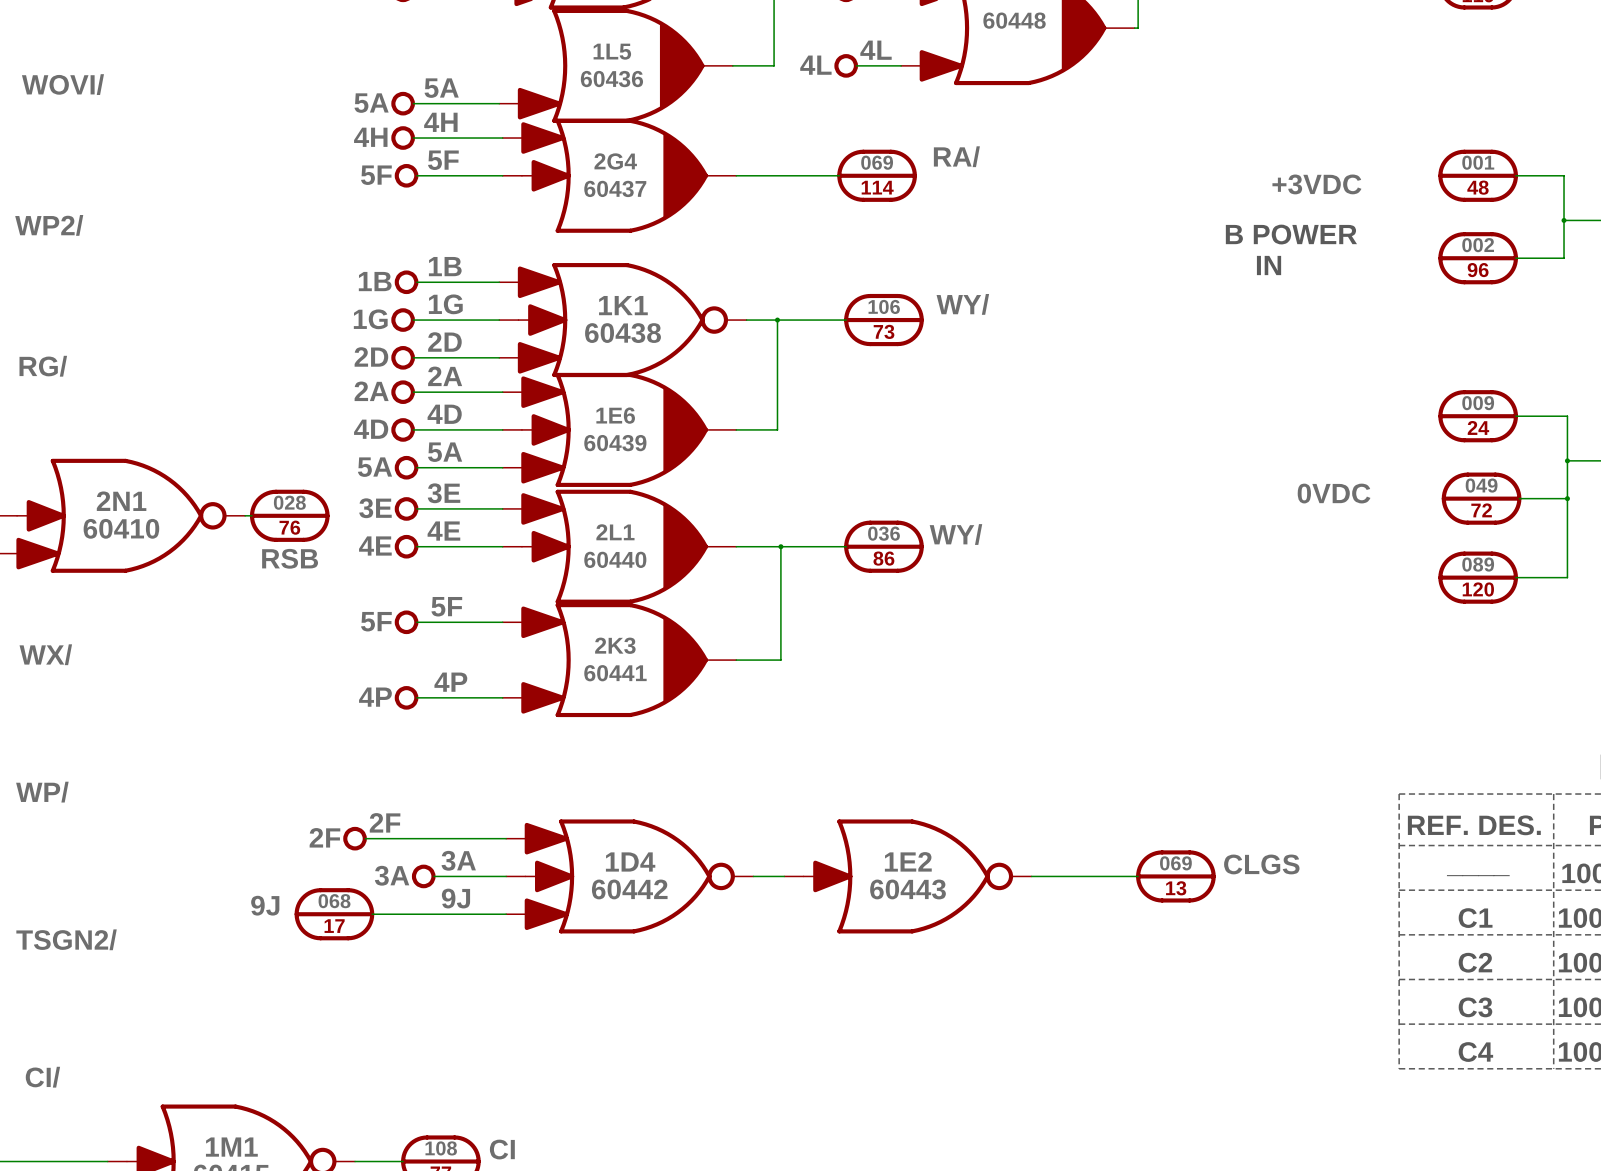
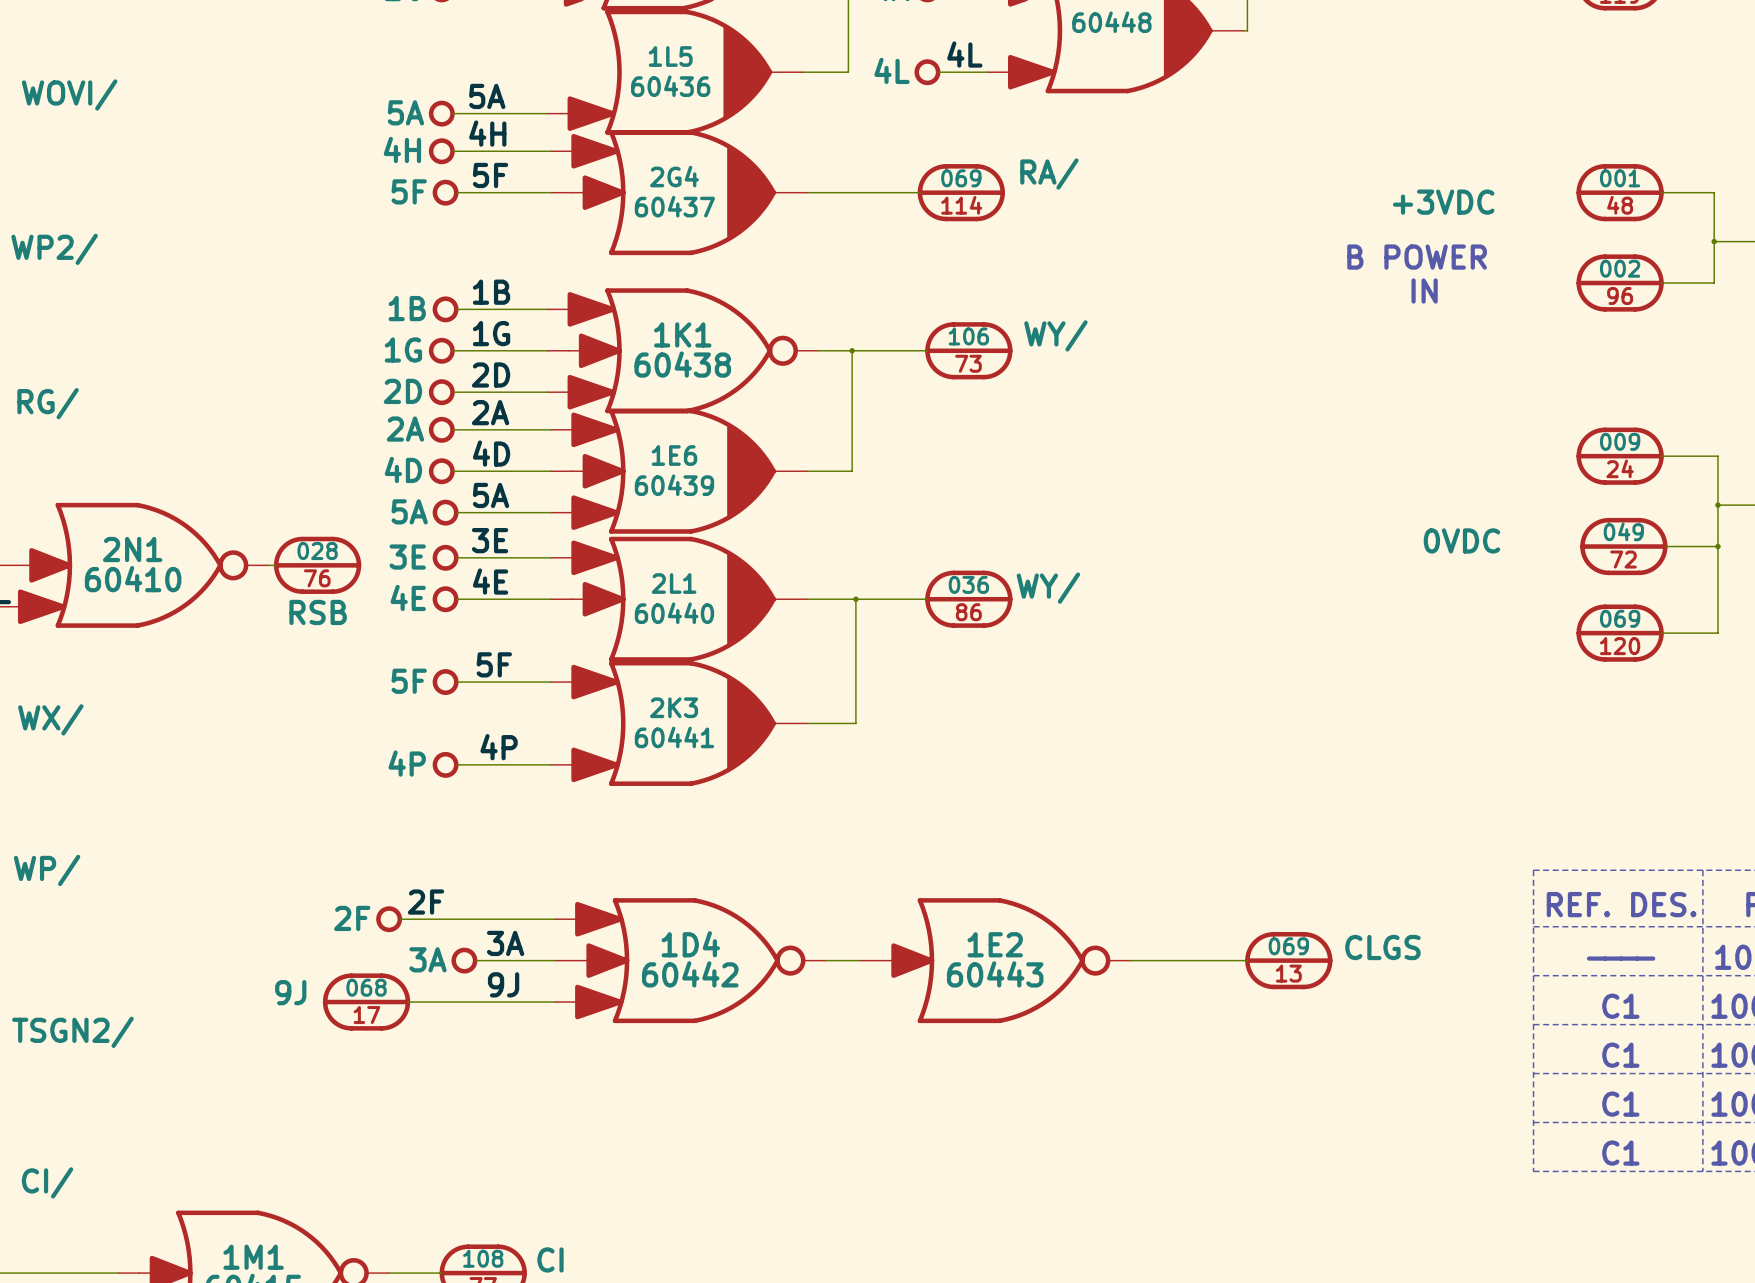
part text: 089 (1478, 564) -> 069 (1620, 618)
text: C2 (1475, 962) -> C1 (1620, 1055)
text: C3 (1475, 1007) -> C1 (1620, 1104)
text: C4 (1475, 1052) -> C1 (1620, 1153)

